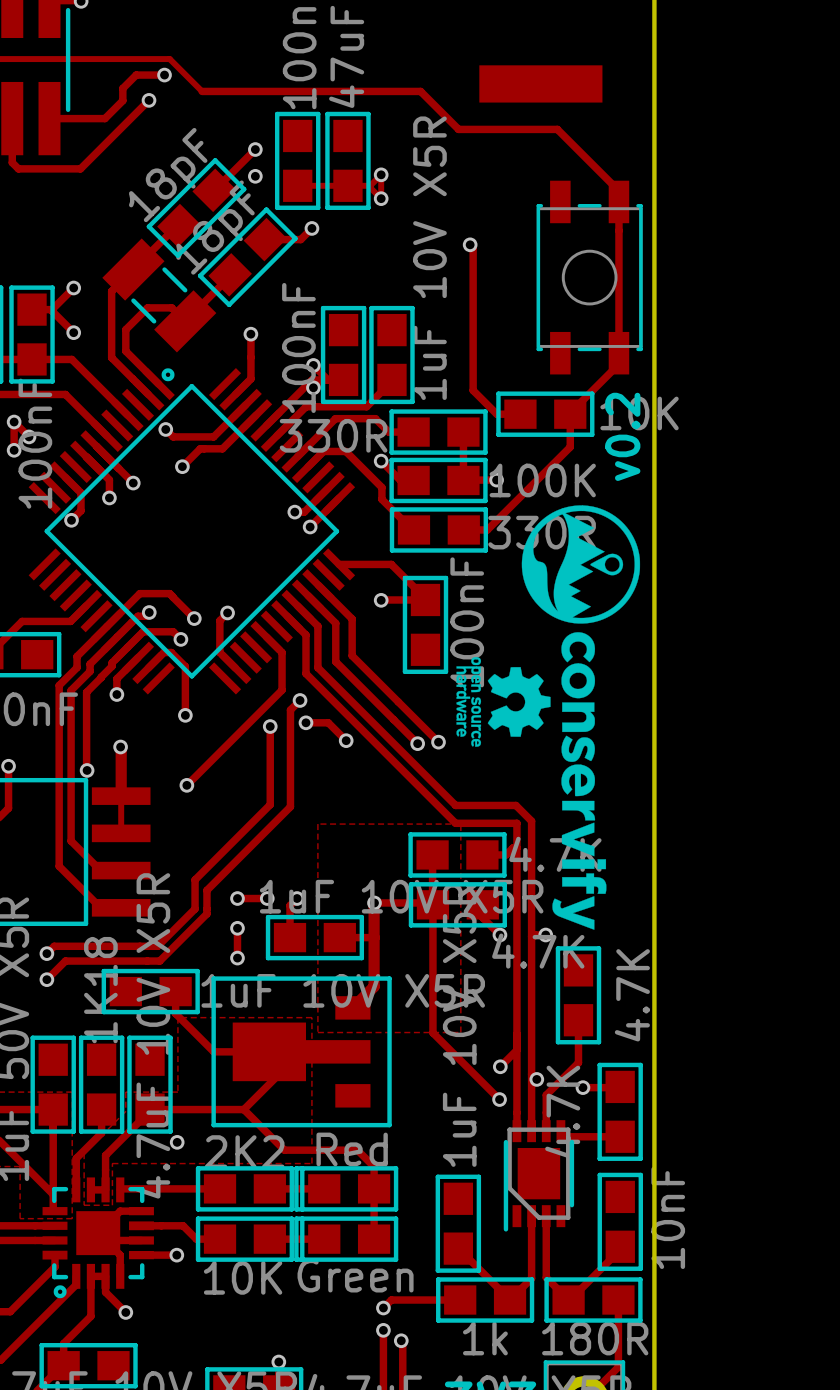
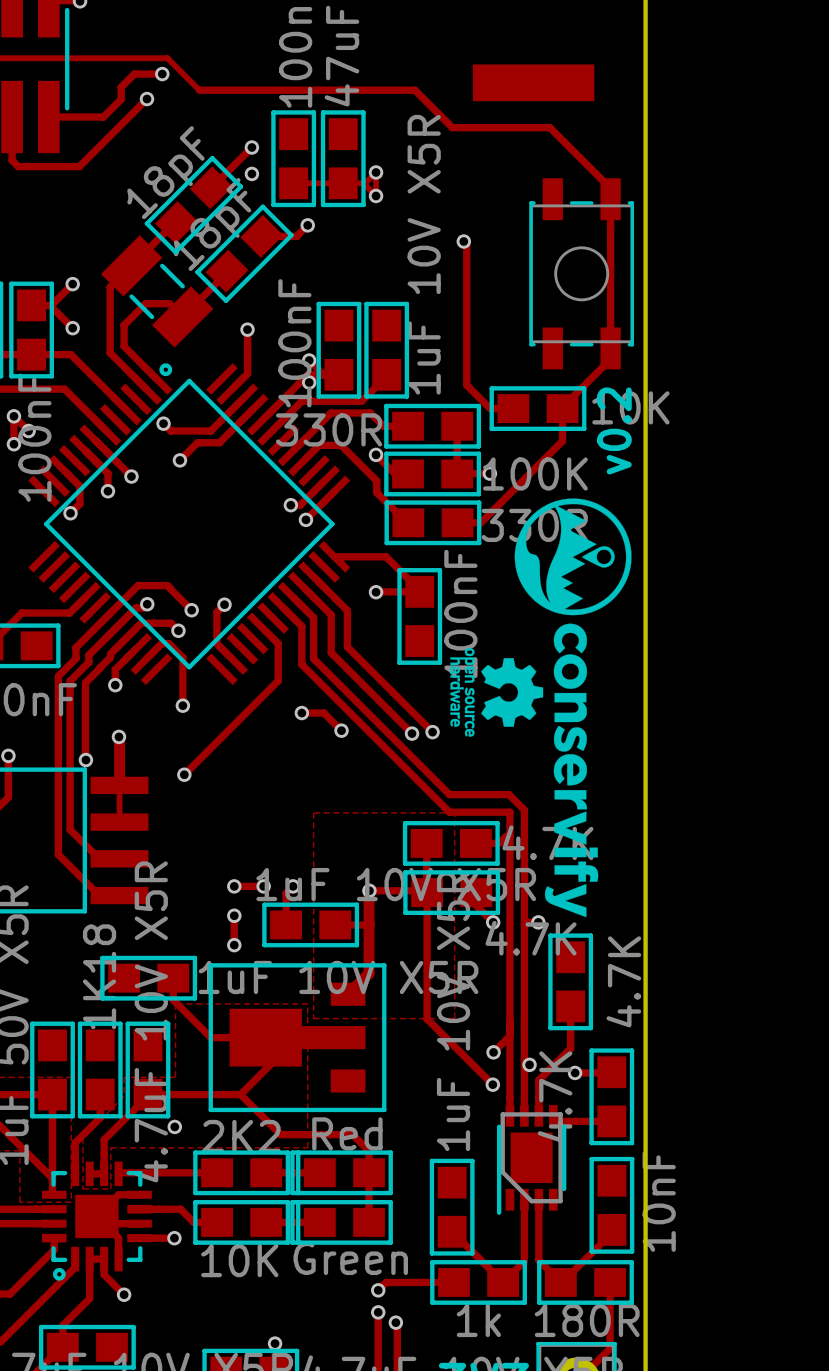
track: (300, 700) (290, 710) (290, 806) (206, 890) (206, 913) (159, 961) (65, 961) (46, 979) -> none
via: (300, 700) -> none
track: (270, 726) (270, 804) (195, 879) (195, 908) (157, 946) (54, 946) (46, 953) -> none
via: (270, 726) -> none
via: (46, 953) -> none
via: (46, 979) -> none

